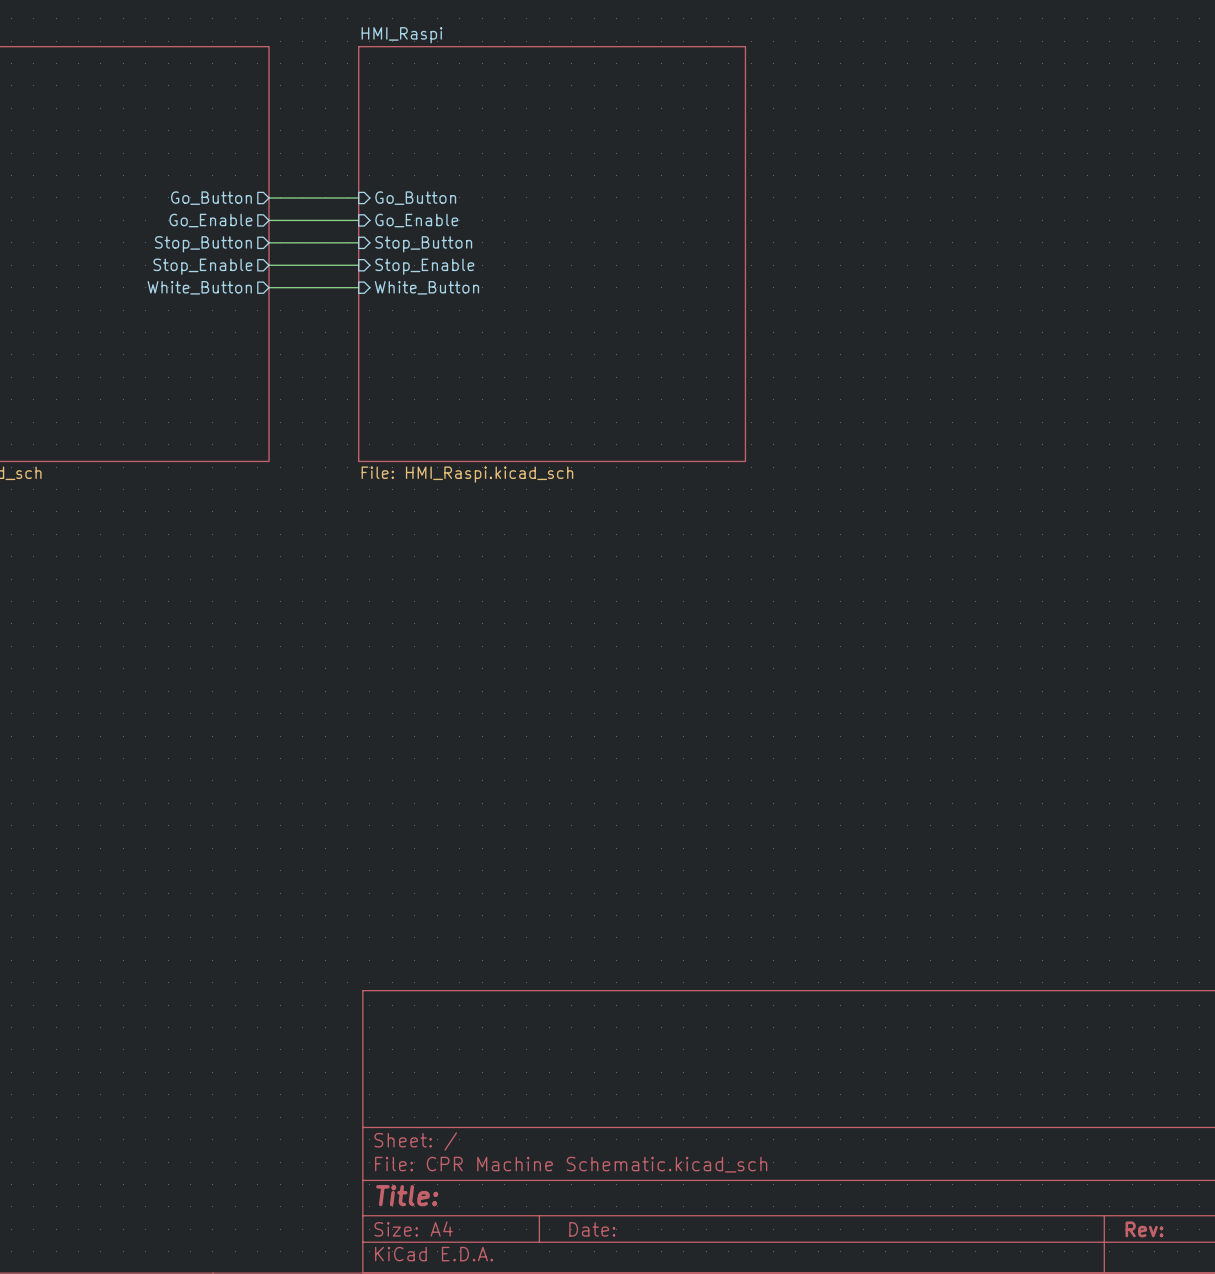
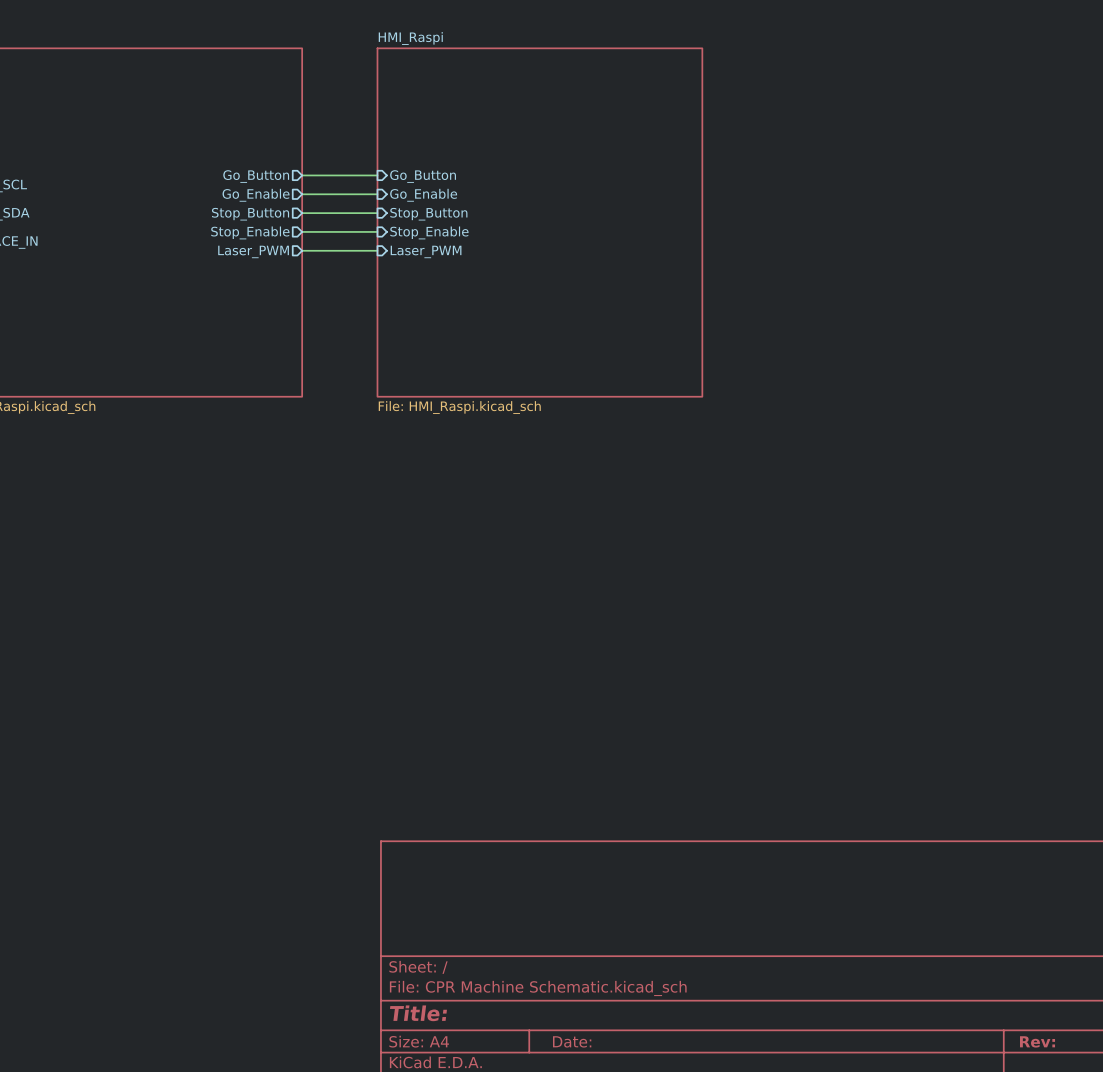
sheet pin: White_Button (199, 287) -> Laser_PWM (253, 251)
sheet pin: White_Button (426, 287) -> Laser_PWM (426, 251)

